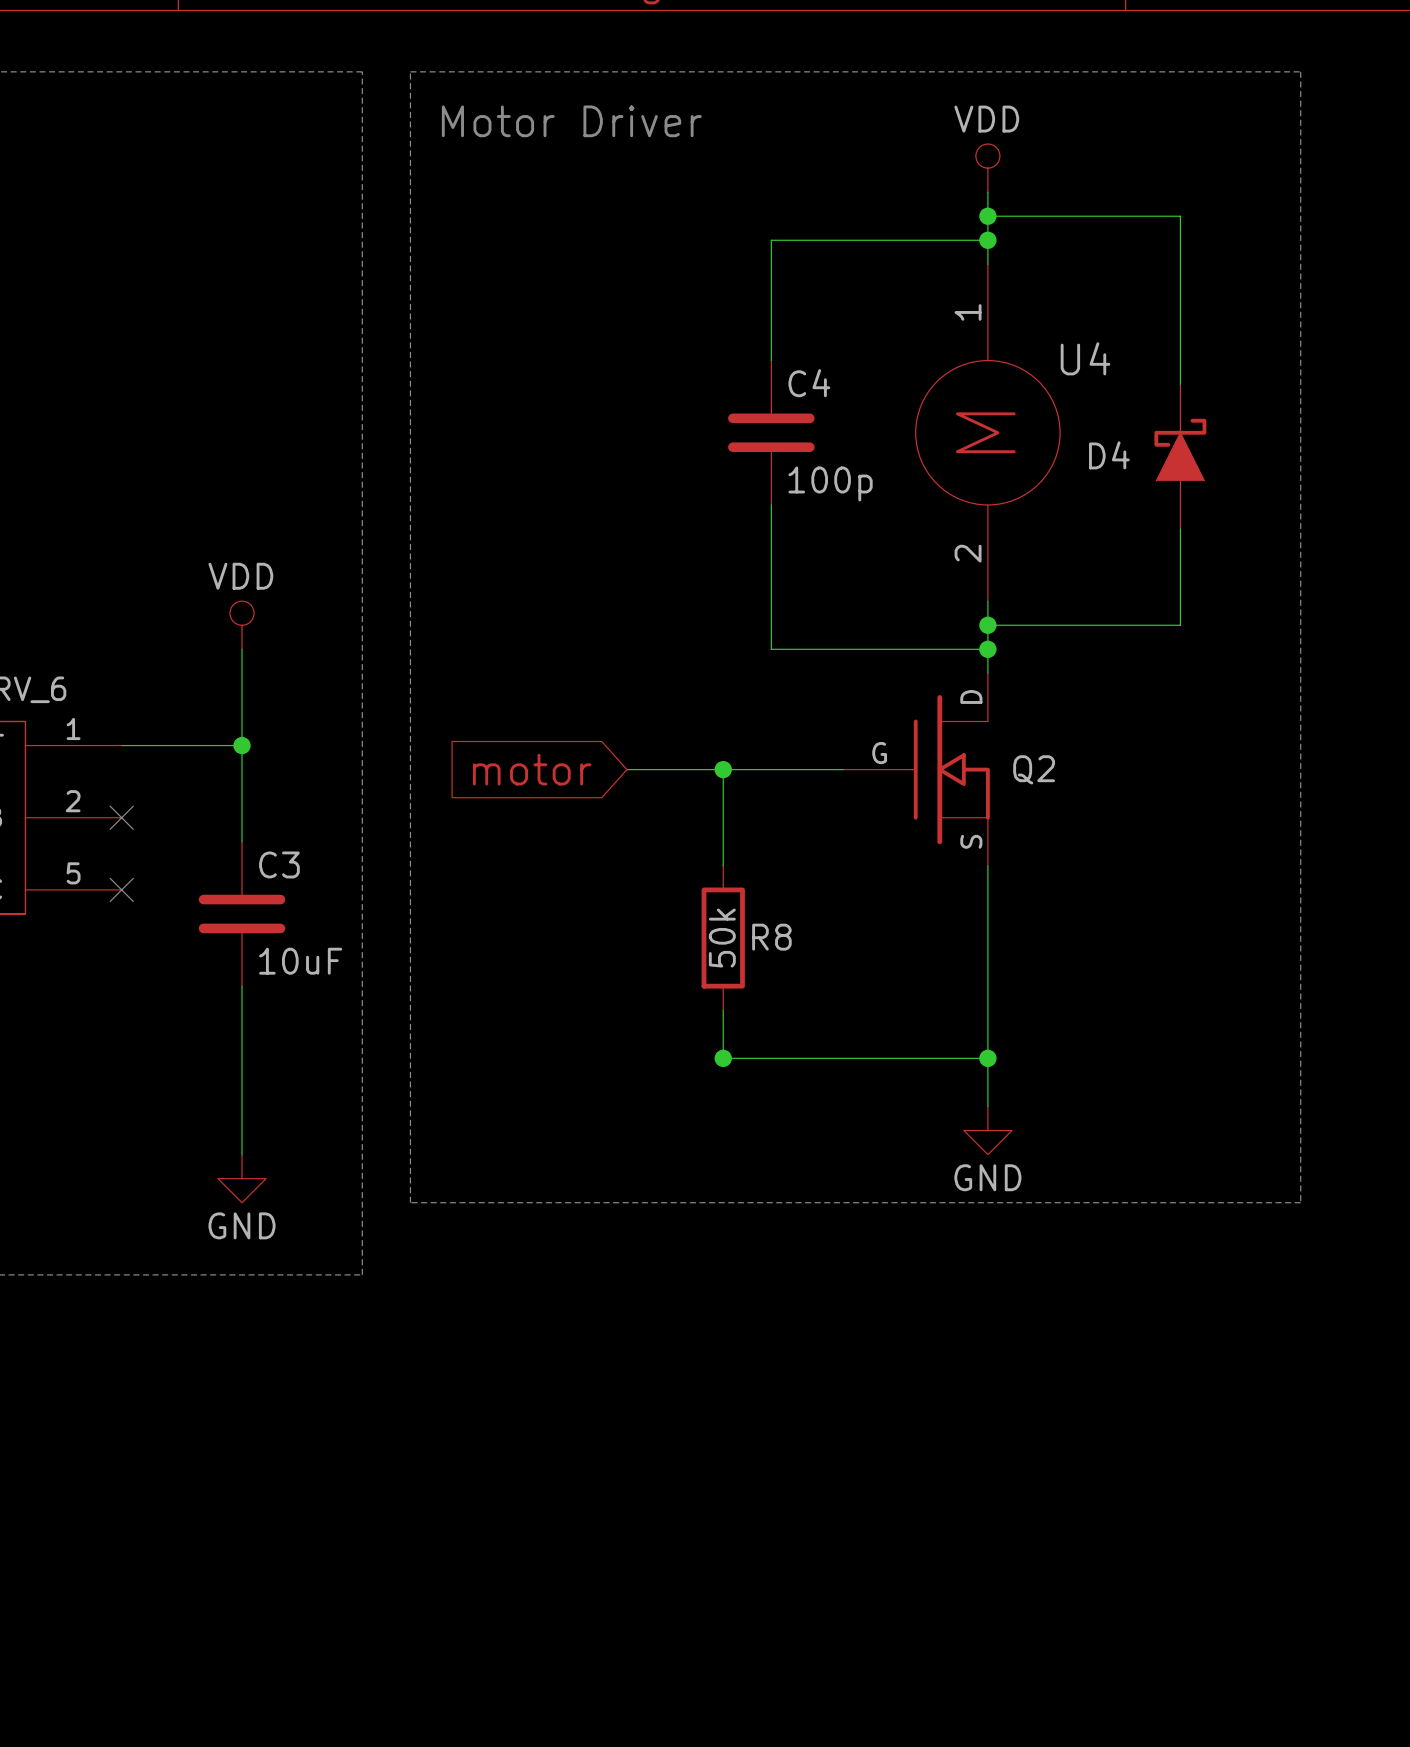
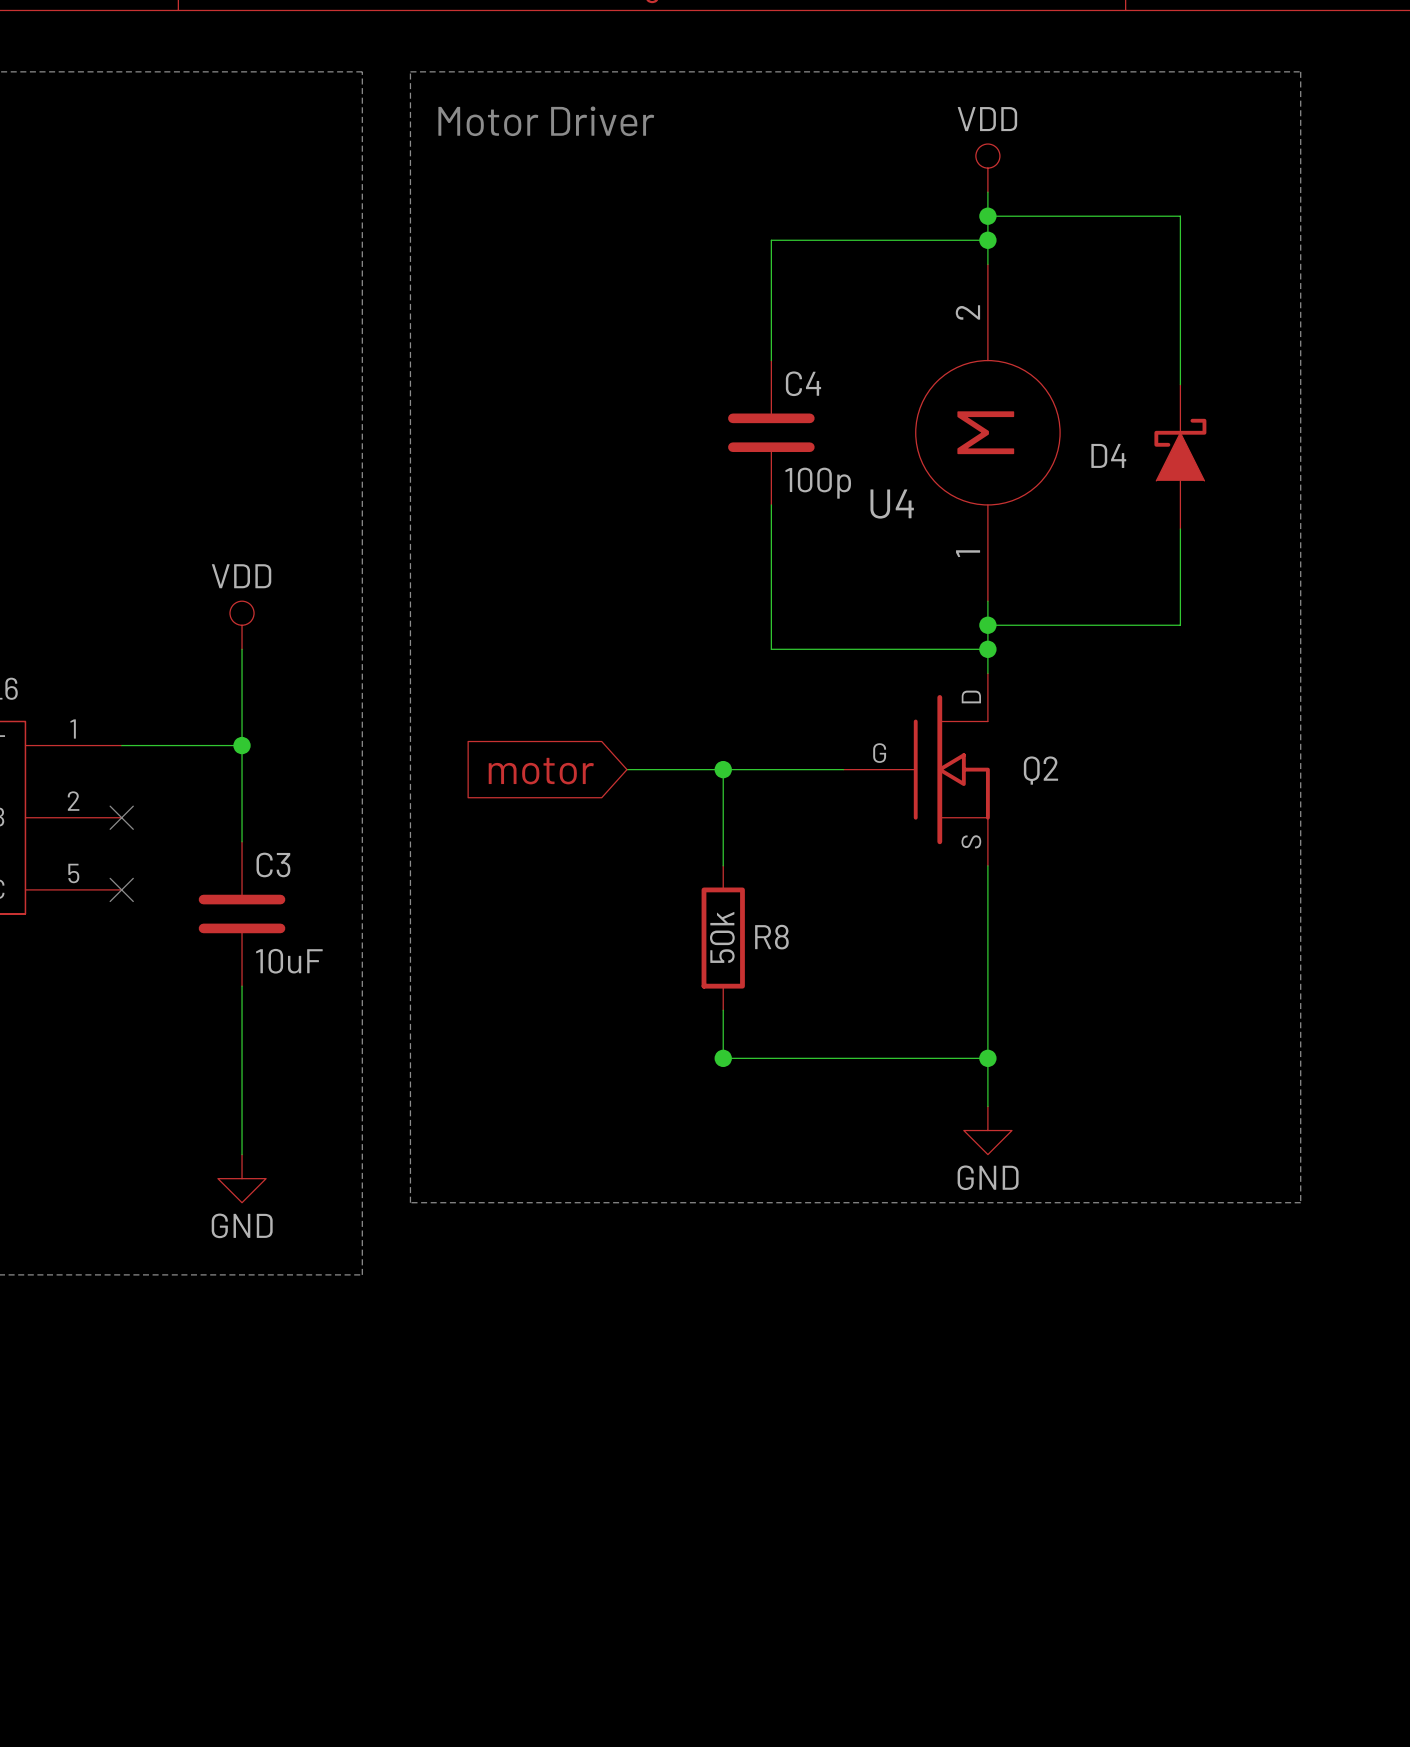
U4 rotation: 0° (987, 432) -> 180° (987, 432)

